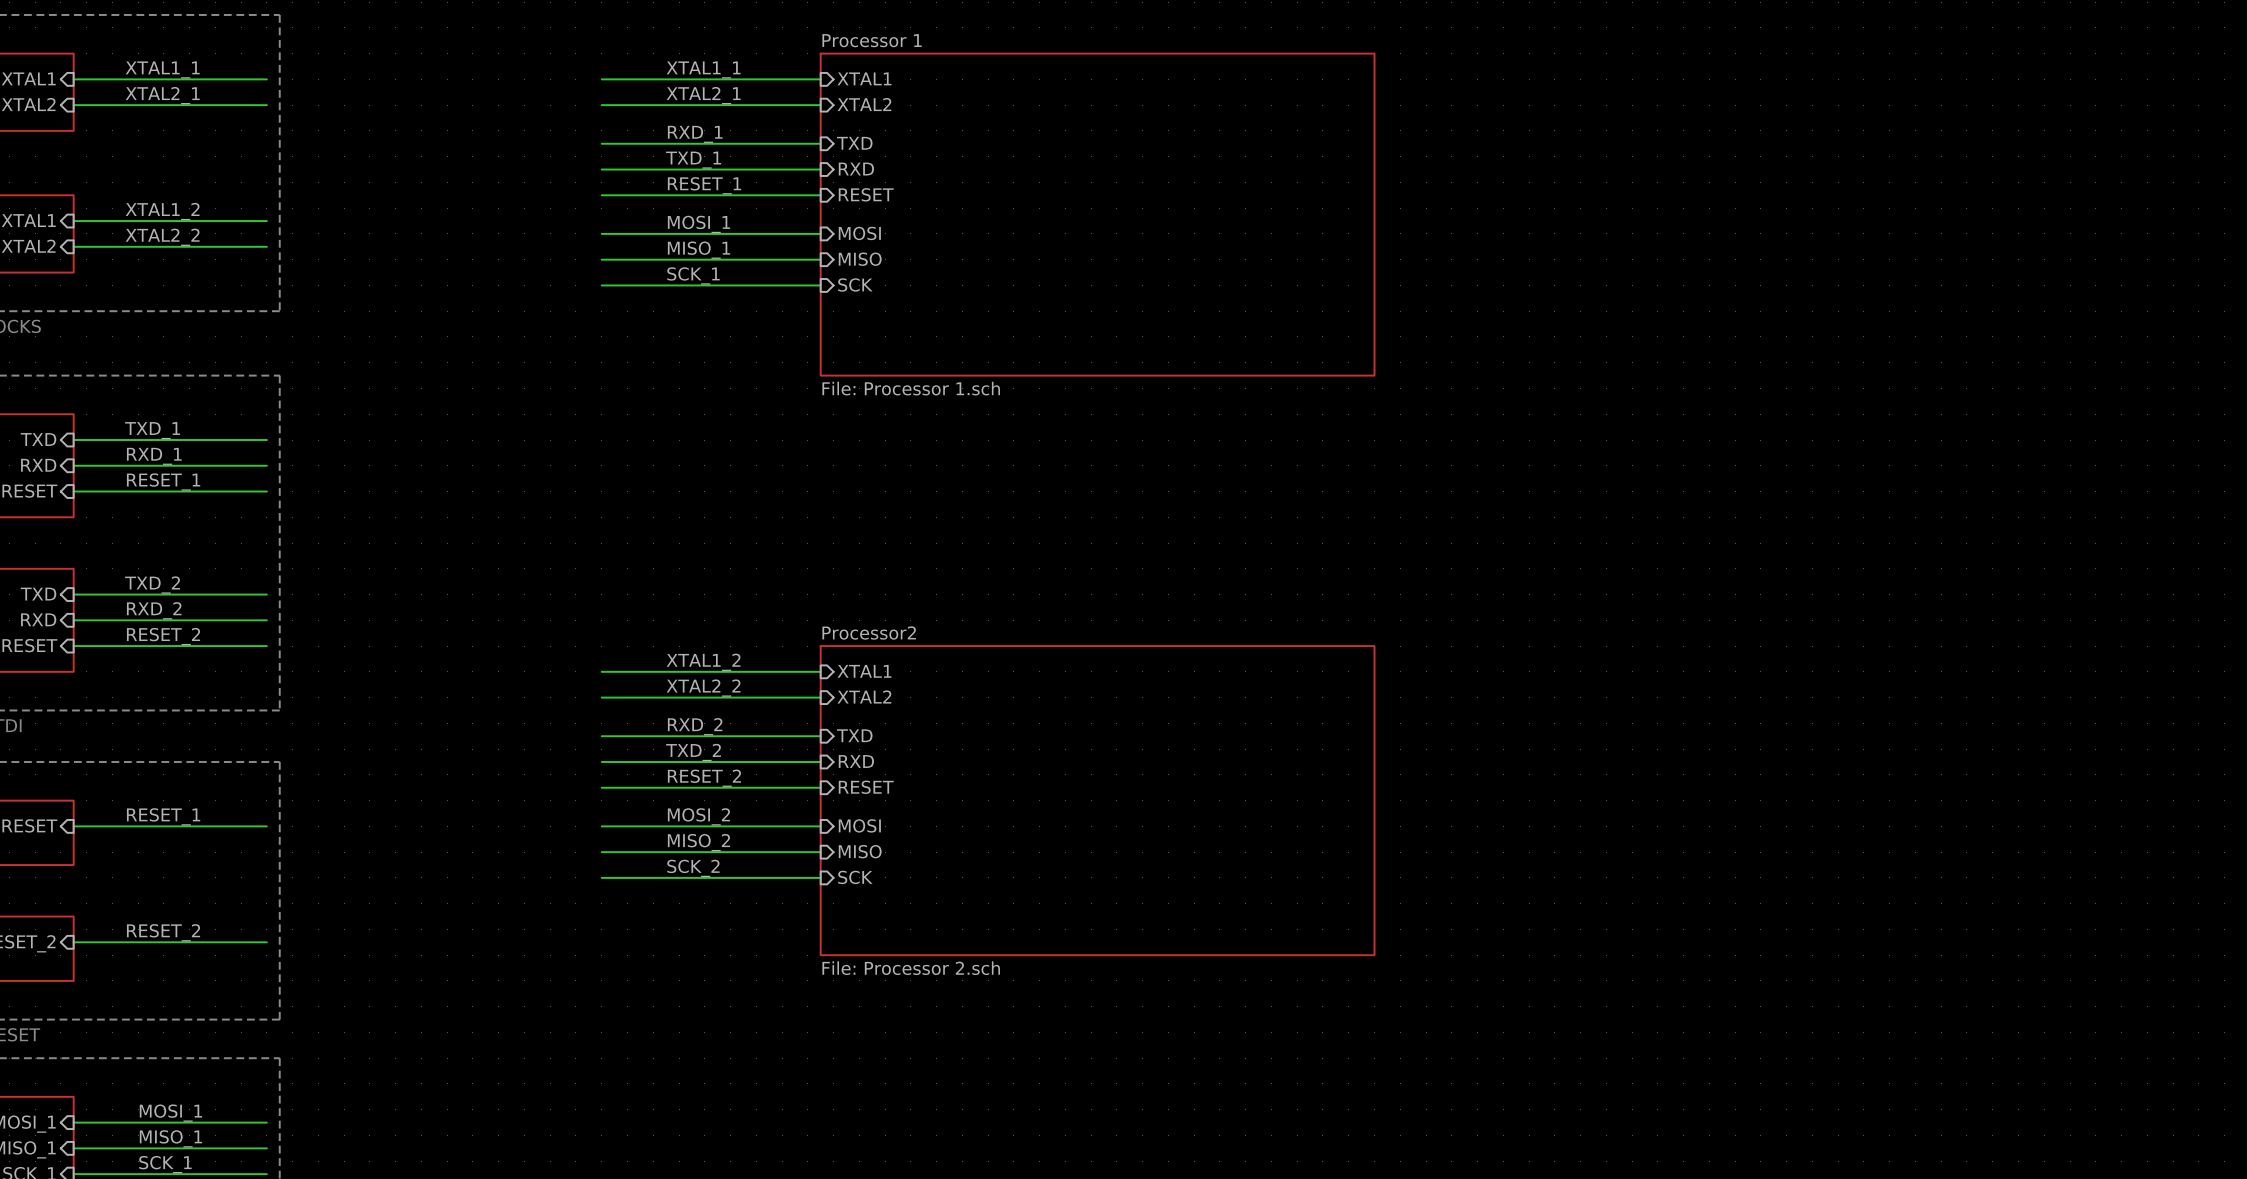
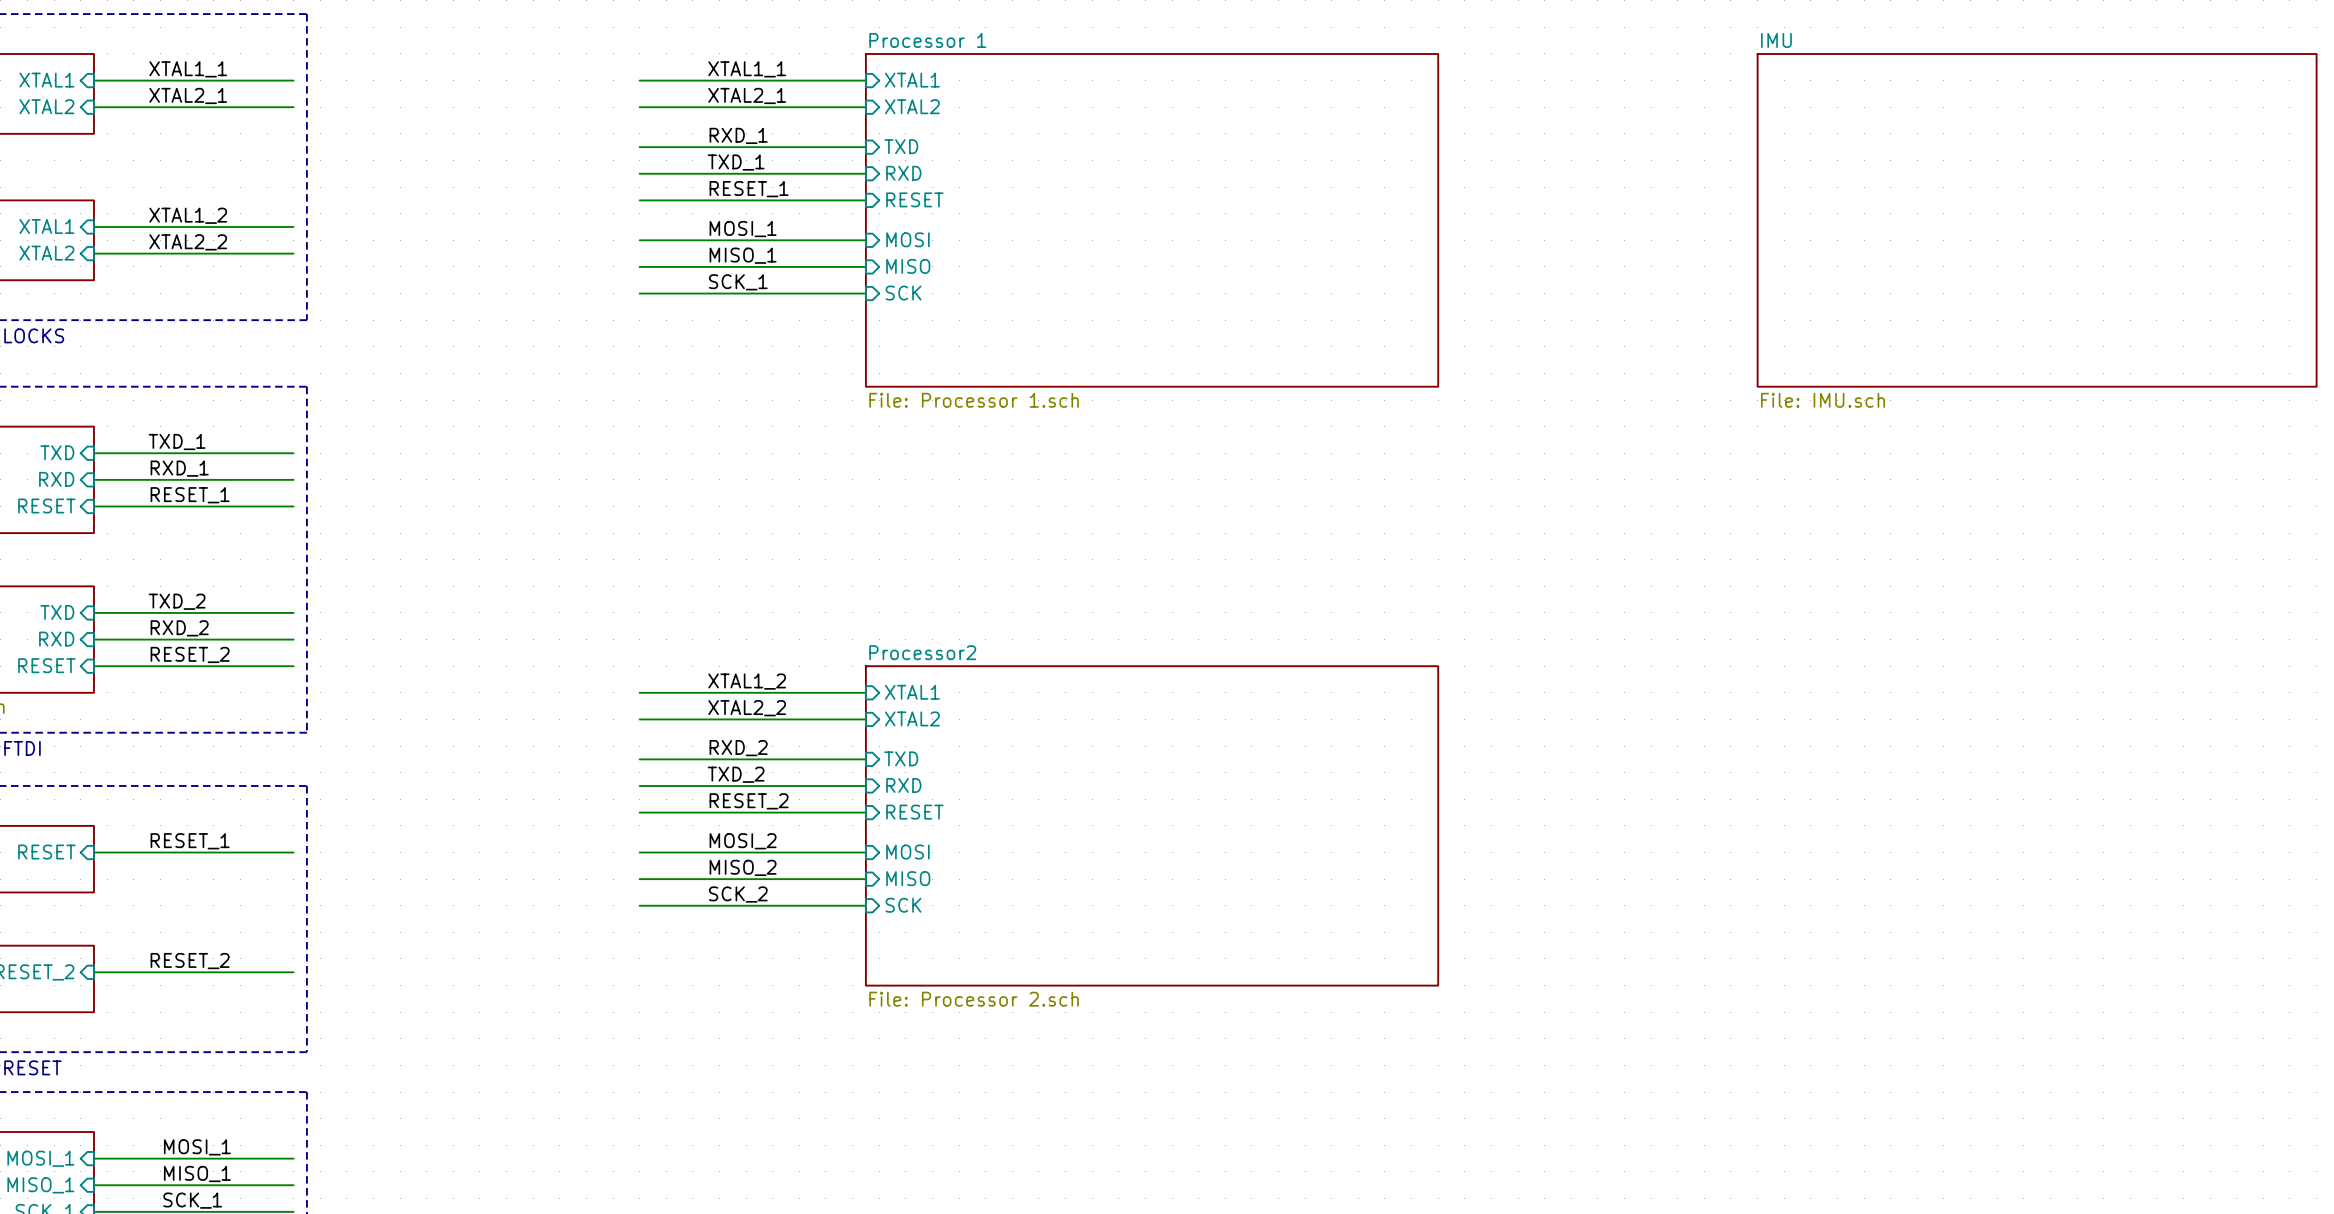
sheet IMU: none -> File: IMU.sch (2037, 220)

